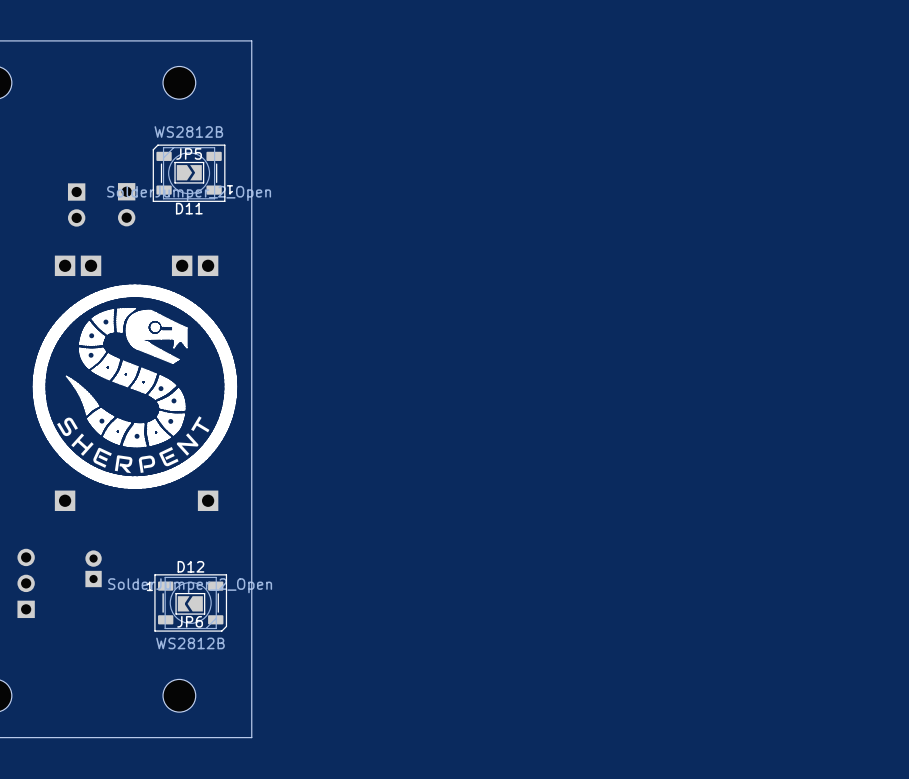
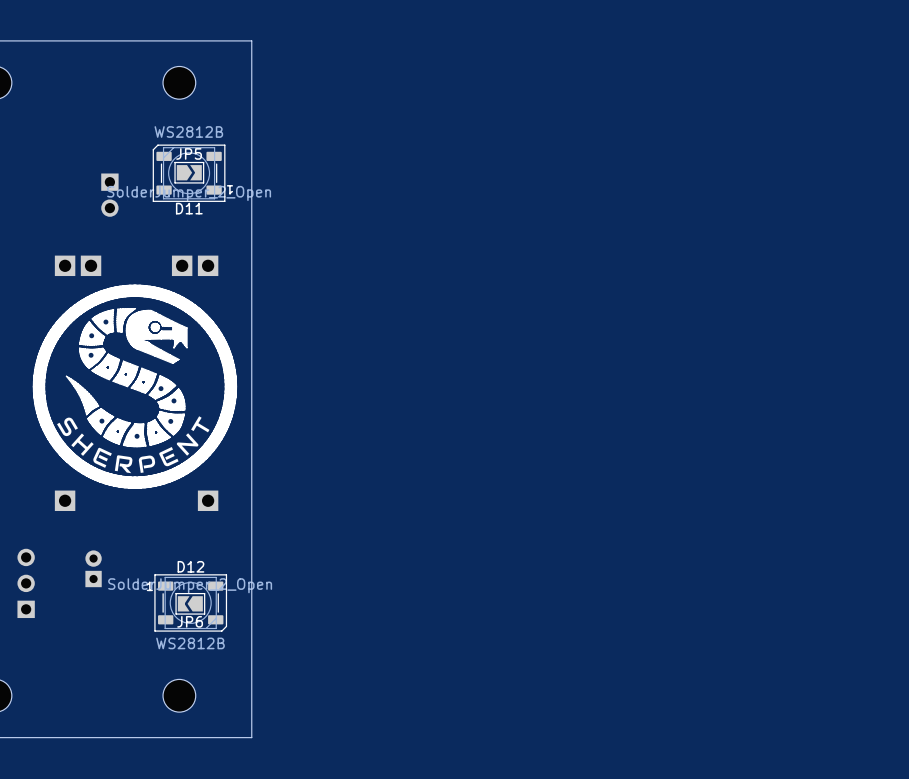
part: none -> (109, 195)
part: (76, 204) -> none
part: (126, 204) -> none

